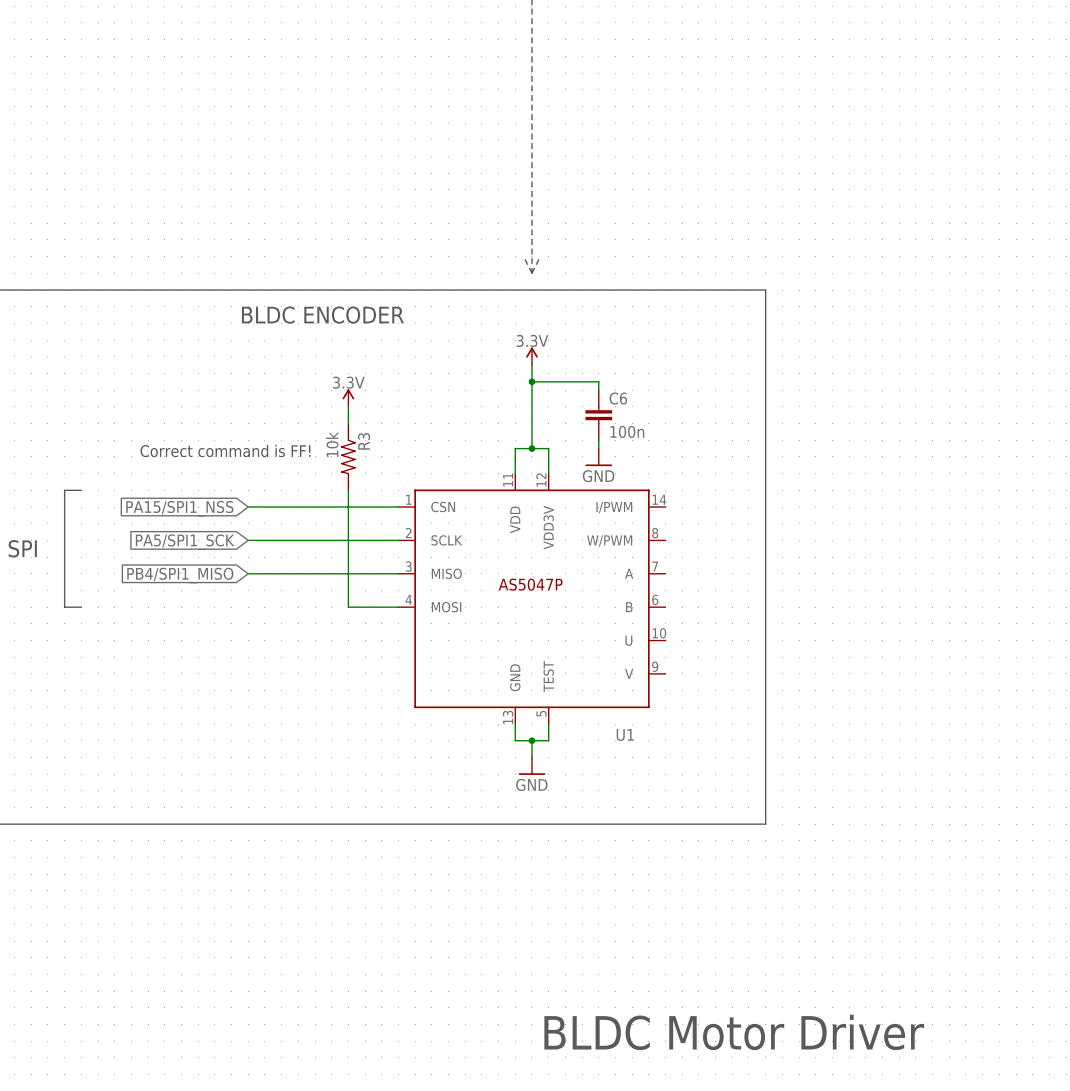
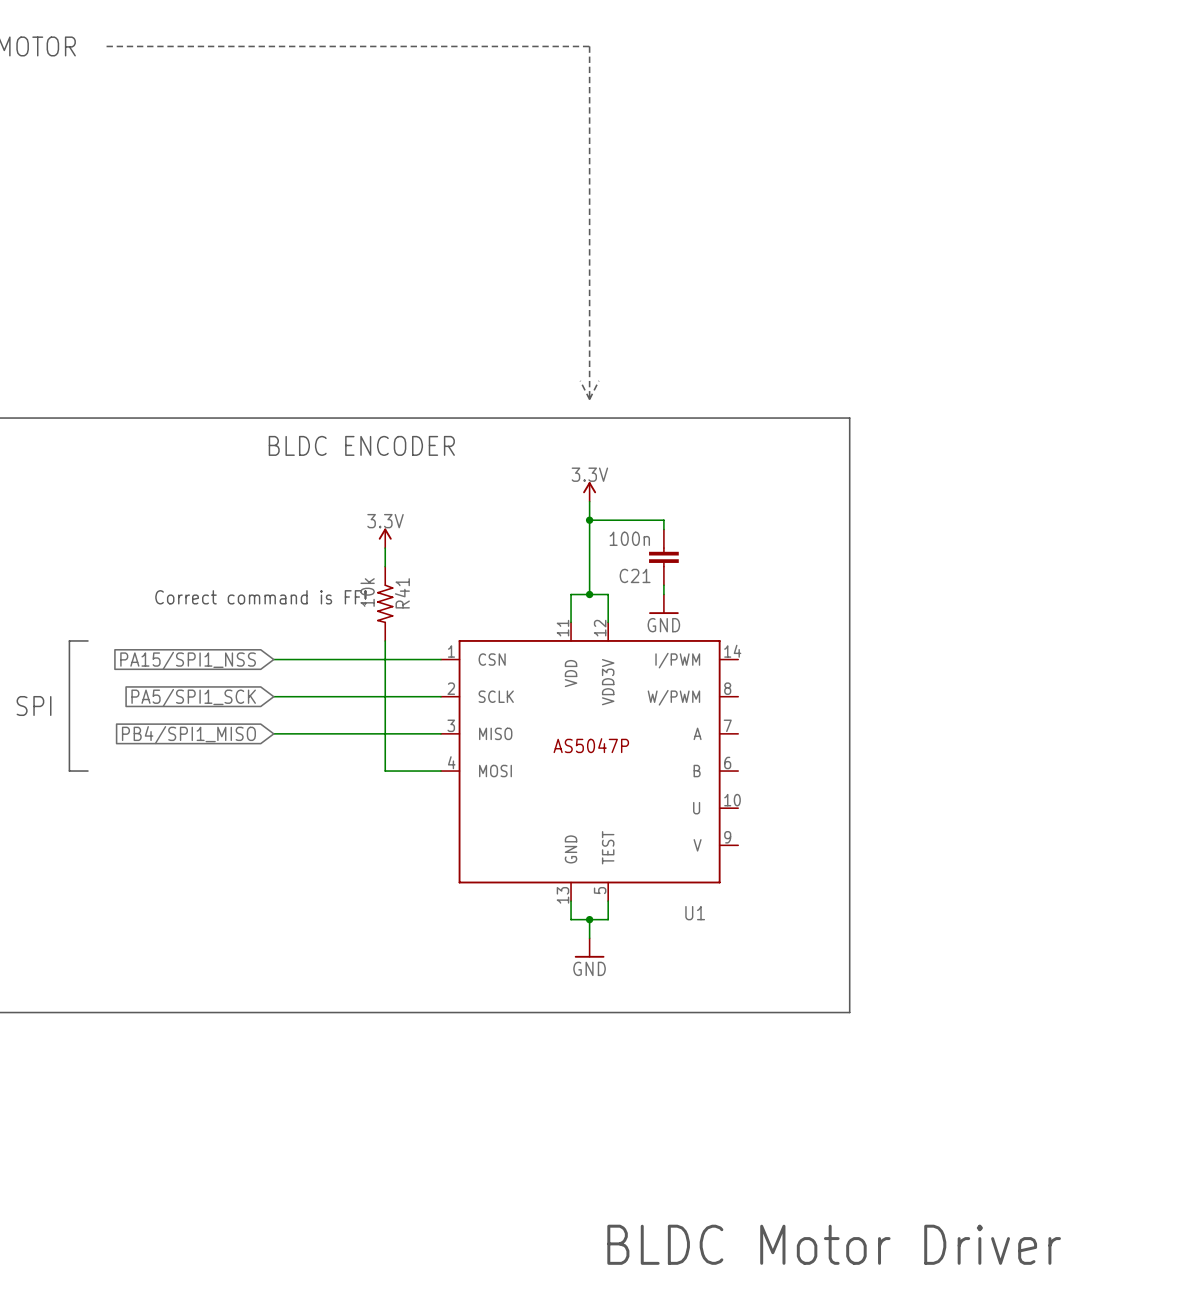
C6 name: C6 (618, 398) -> C21 (635, 575)
C6 value position: 100n (627, 431) -> 100n (629, 538)
R3 name: R3 (364, 441) -> R41 (402, 593)

